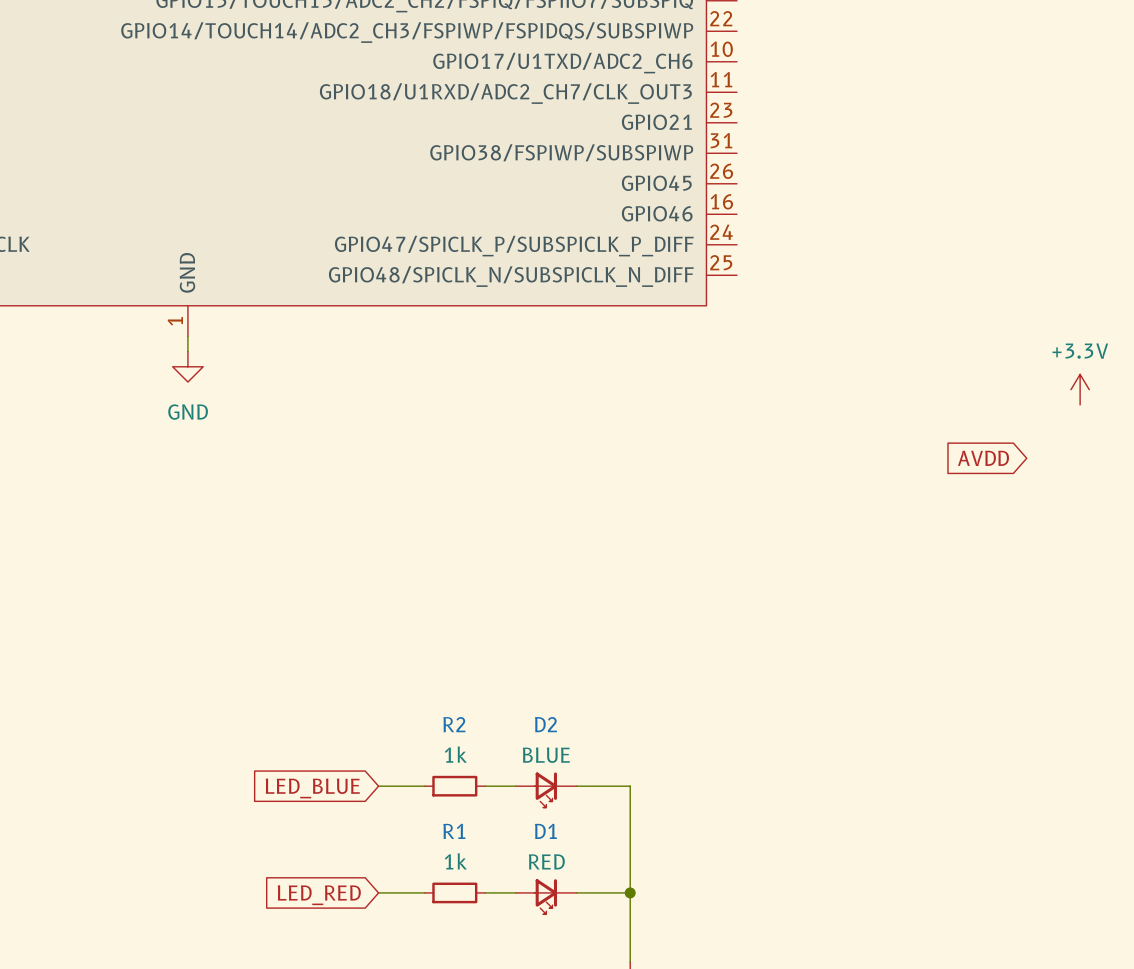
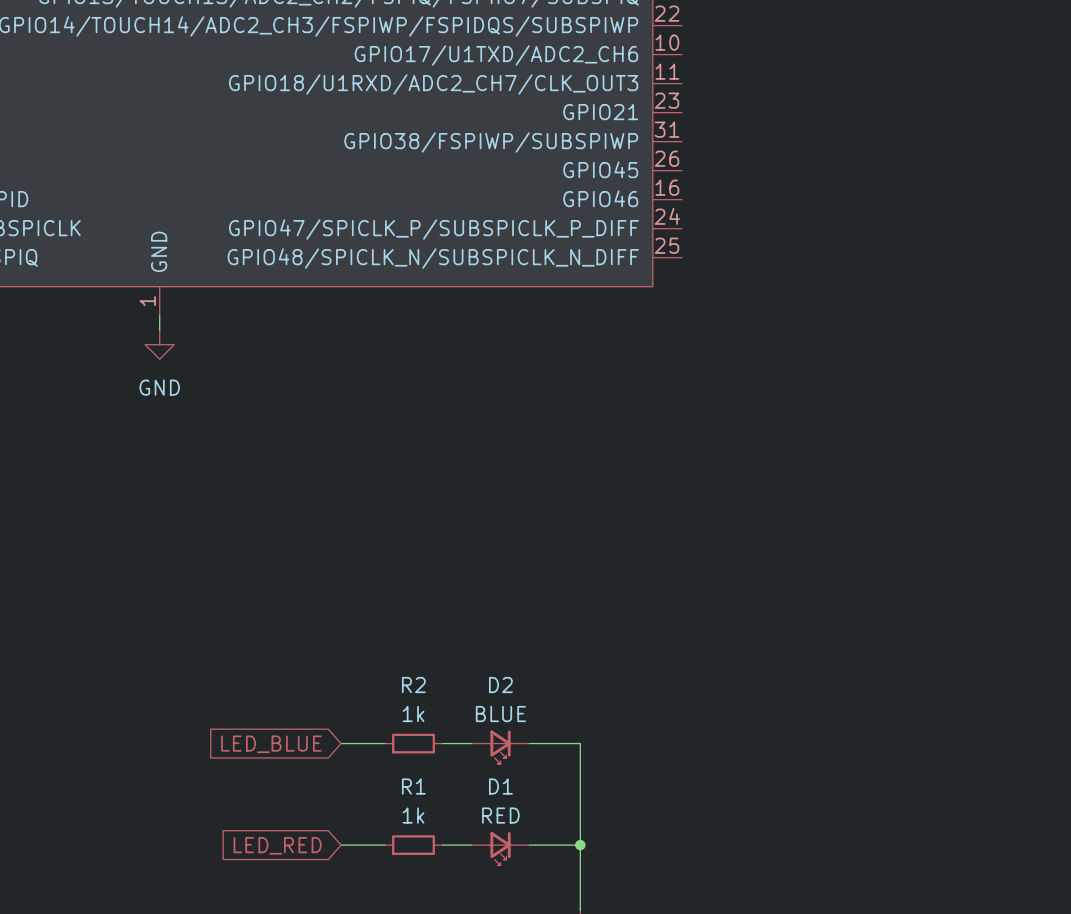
power symbol: +3.3V (1080, 389) -> none
global label: AVDD (983, 458) -> none

